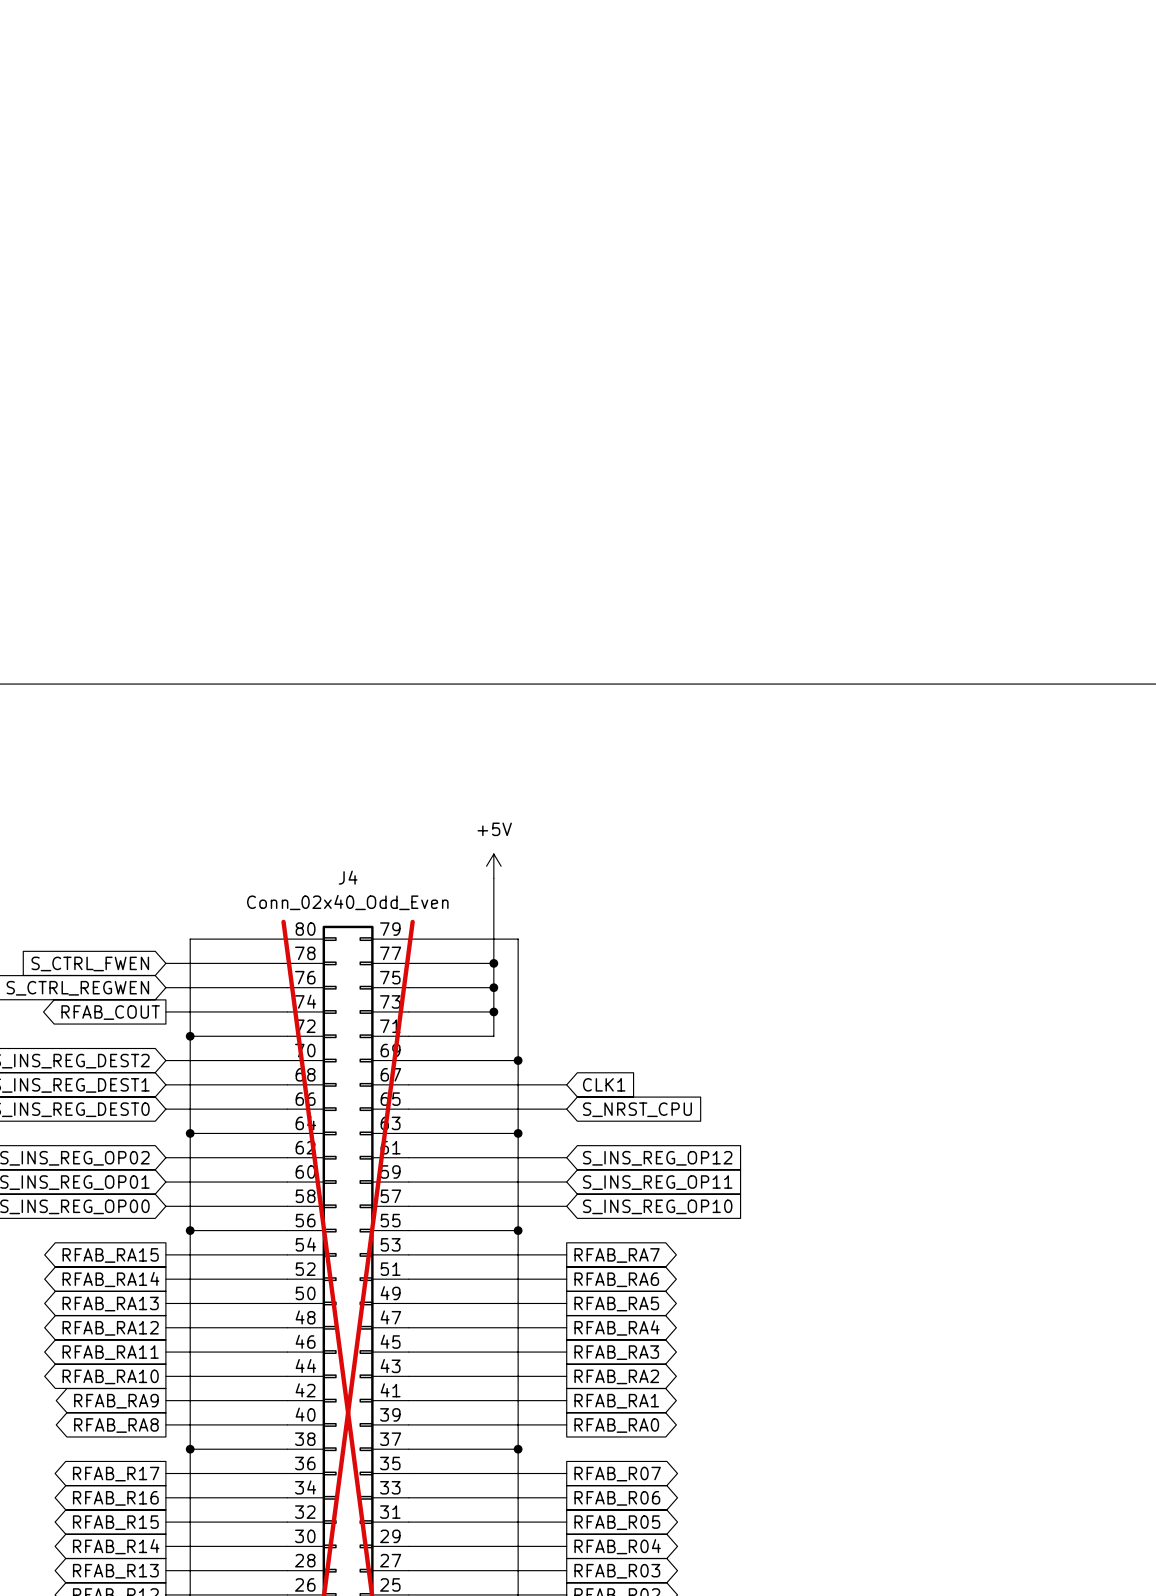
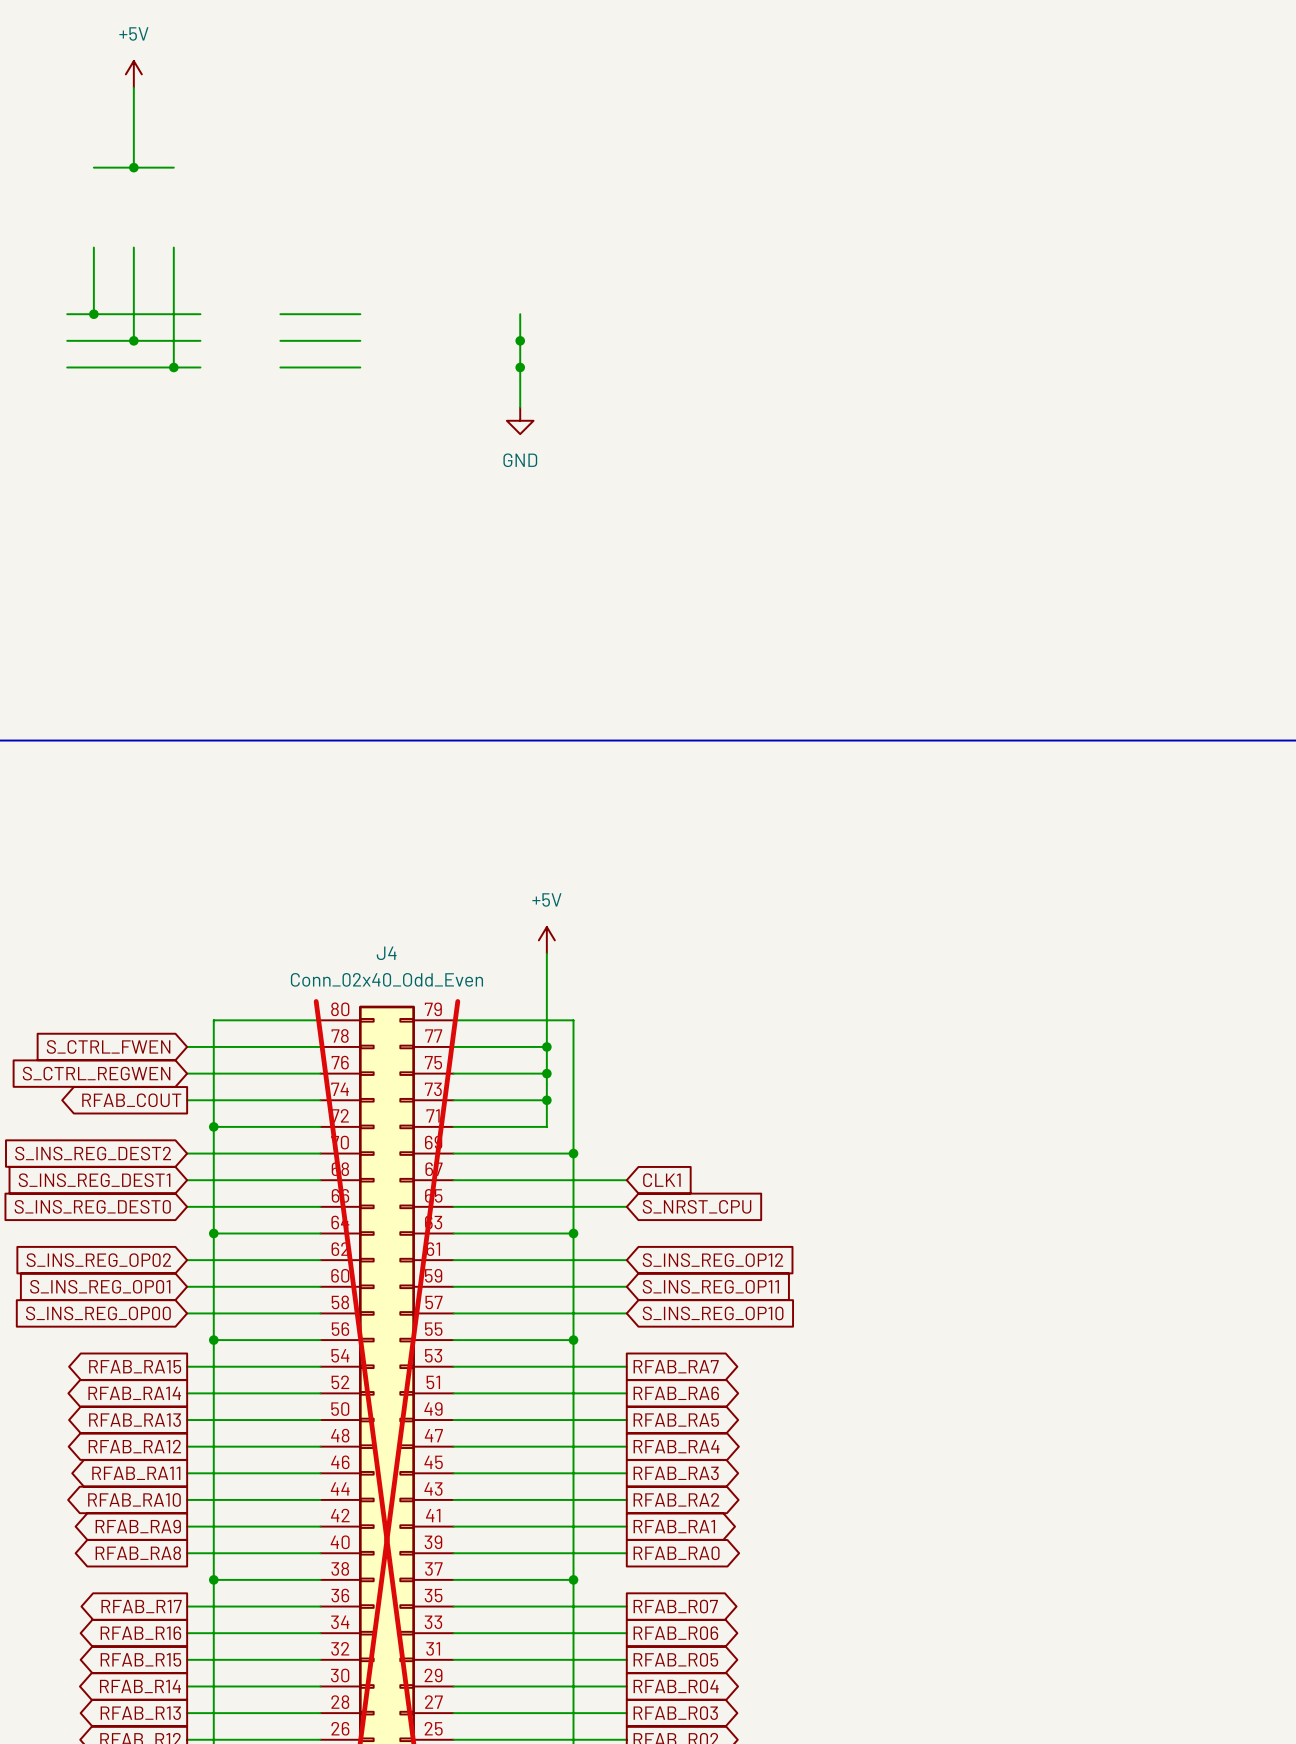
power symbol: none -> +5V (133, 74)
wire: none -> (133, 87) (133, 167)
wire: none -> (93, 167) (173, 167)
junction: none -> (133, 167)
wire: none -> (93, 247) (93, 314)
wire: none -> (133, 247) (133, 340)
wire: none -> (173, 247) (173, 367)
wire: none -> (67, 314) (200, 314)
junction: none -> (93, 314)
wire: none -> (280, 314) (360, 314)
wire: none -> (520, 314) (520, 407)
wire: none -> (67, 340) (200, 340)
junction: none -> (133, 340)
wire: none -> (280, 340) (360, 340)
junction: none -> (520, 340)
wire: none -> (67, 367) (200, 367)
junction: none -> (173, 367)
wire: none -> (280, 367) (360, 367)
junction: none -> (520, 367)
power symbol: none -> GND (520, 420)

